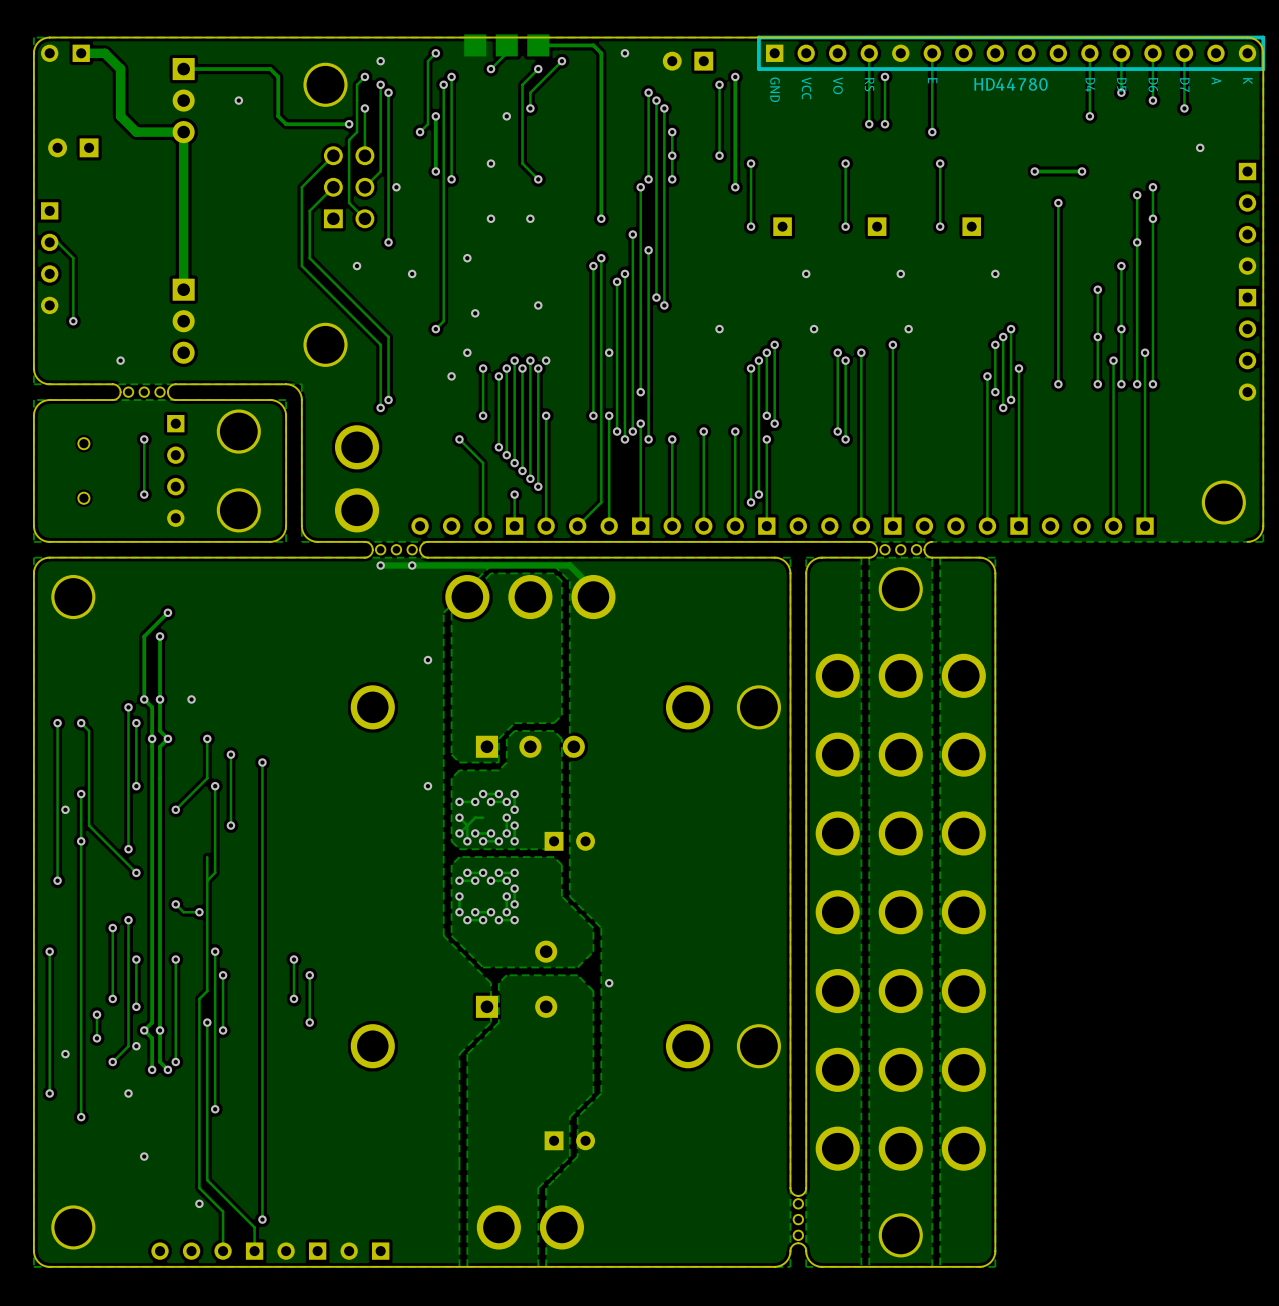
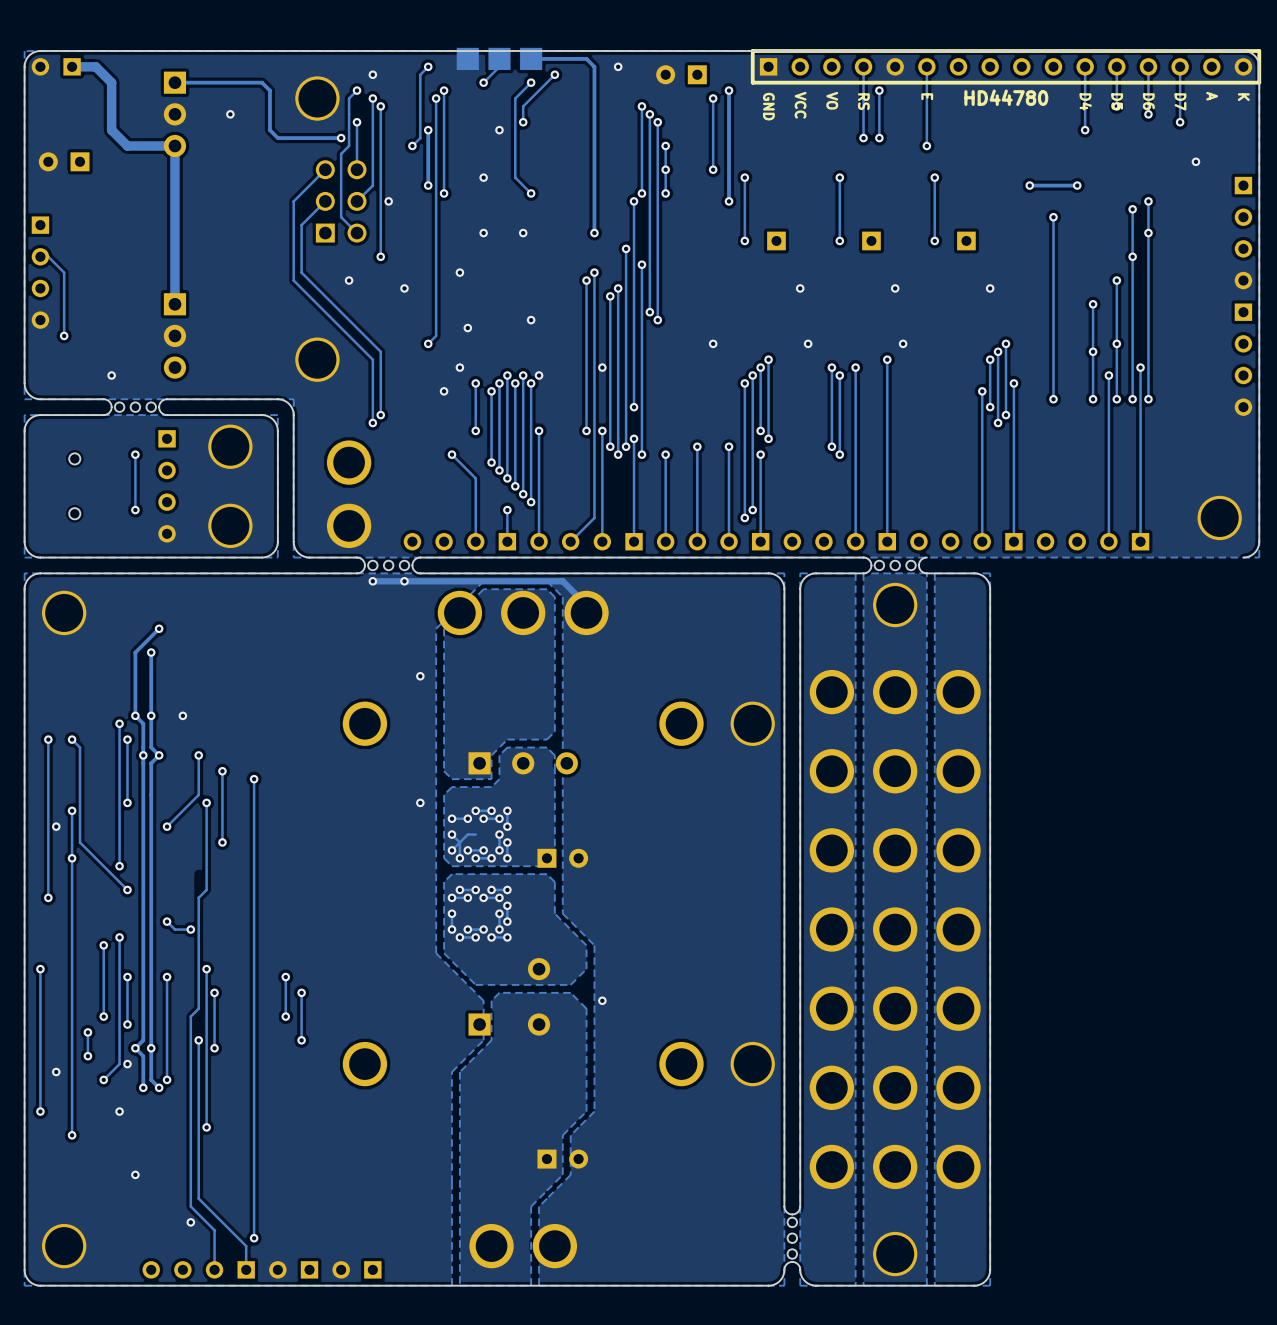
track: (207, 857) (207, 880) -> none

